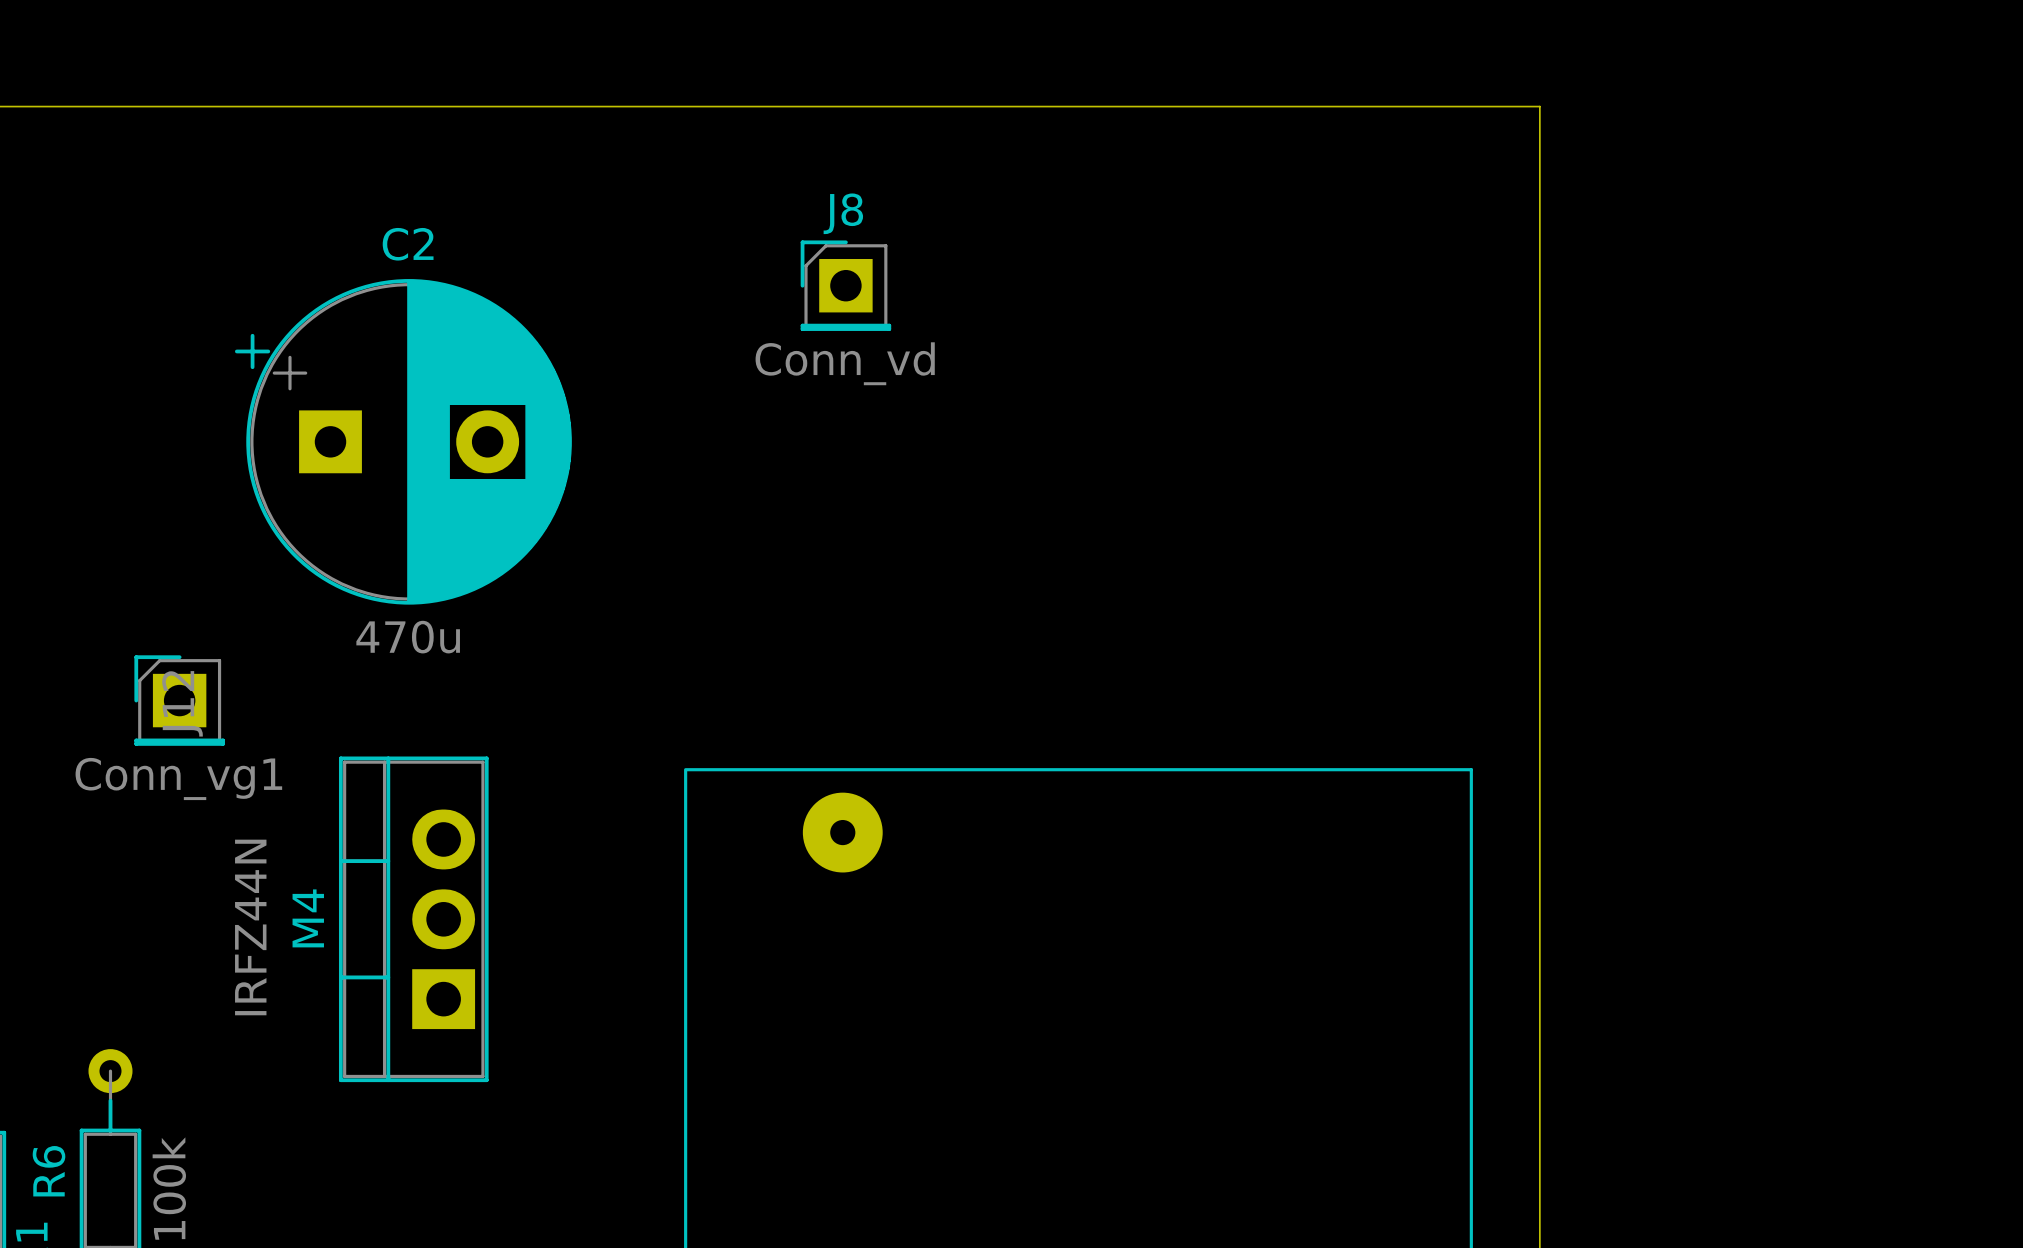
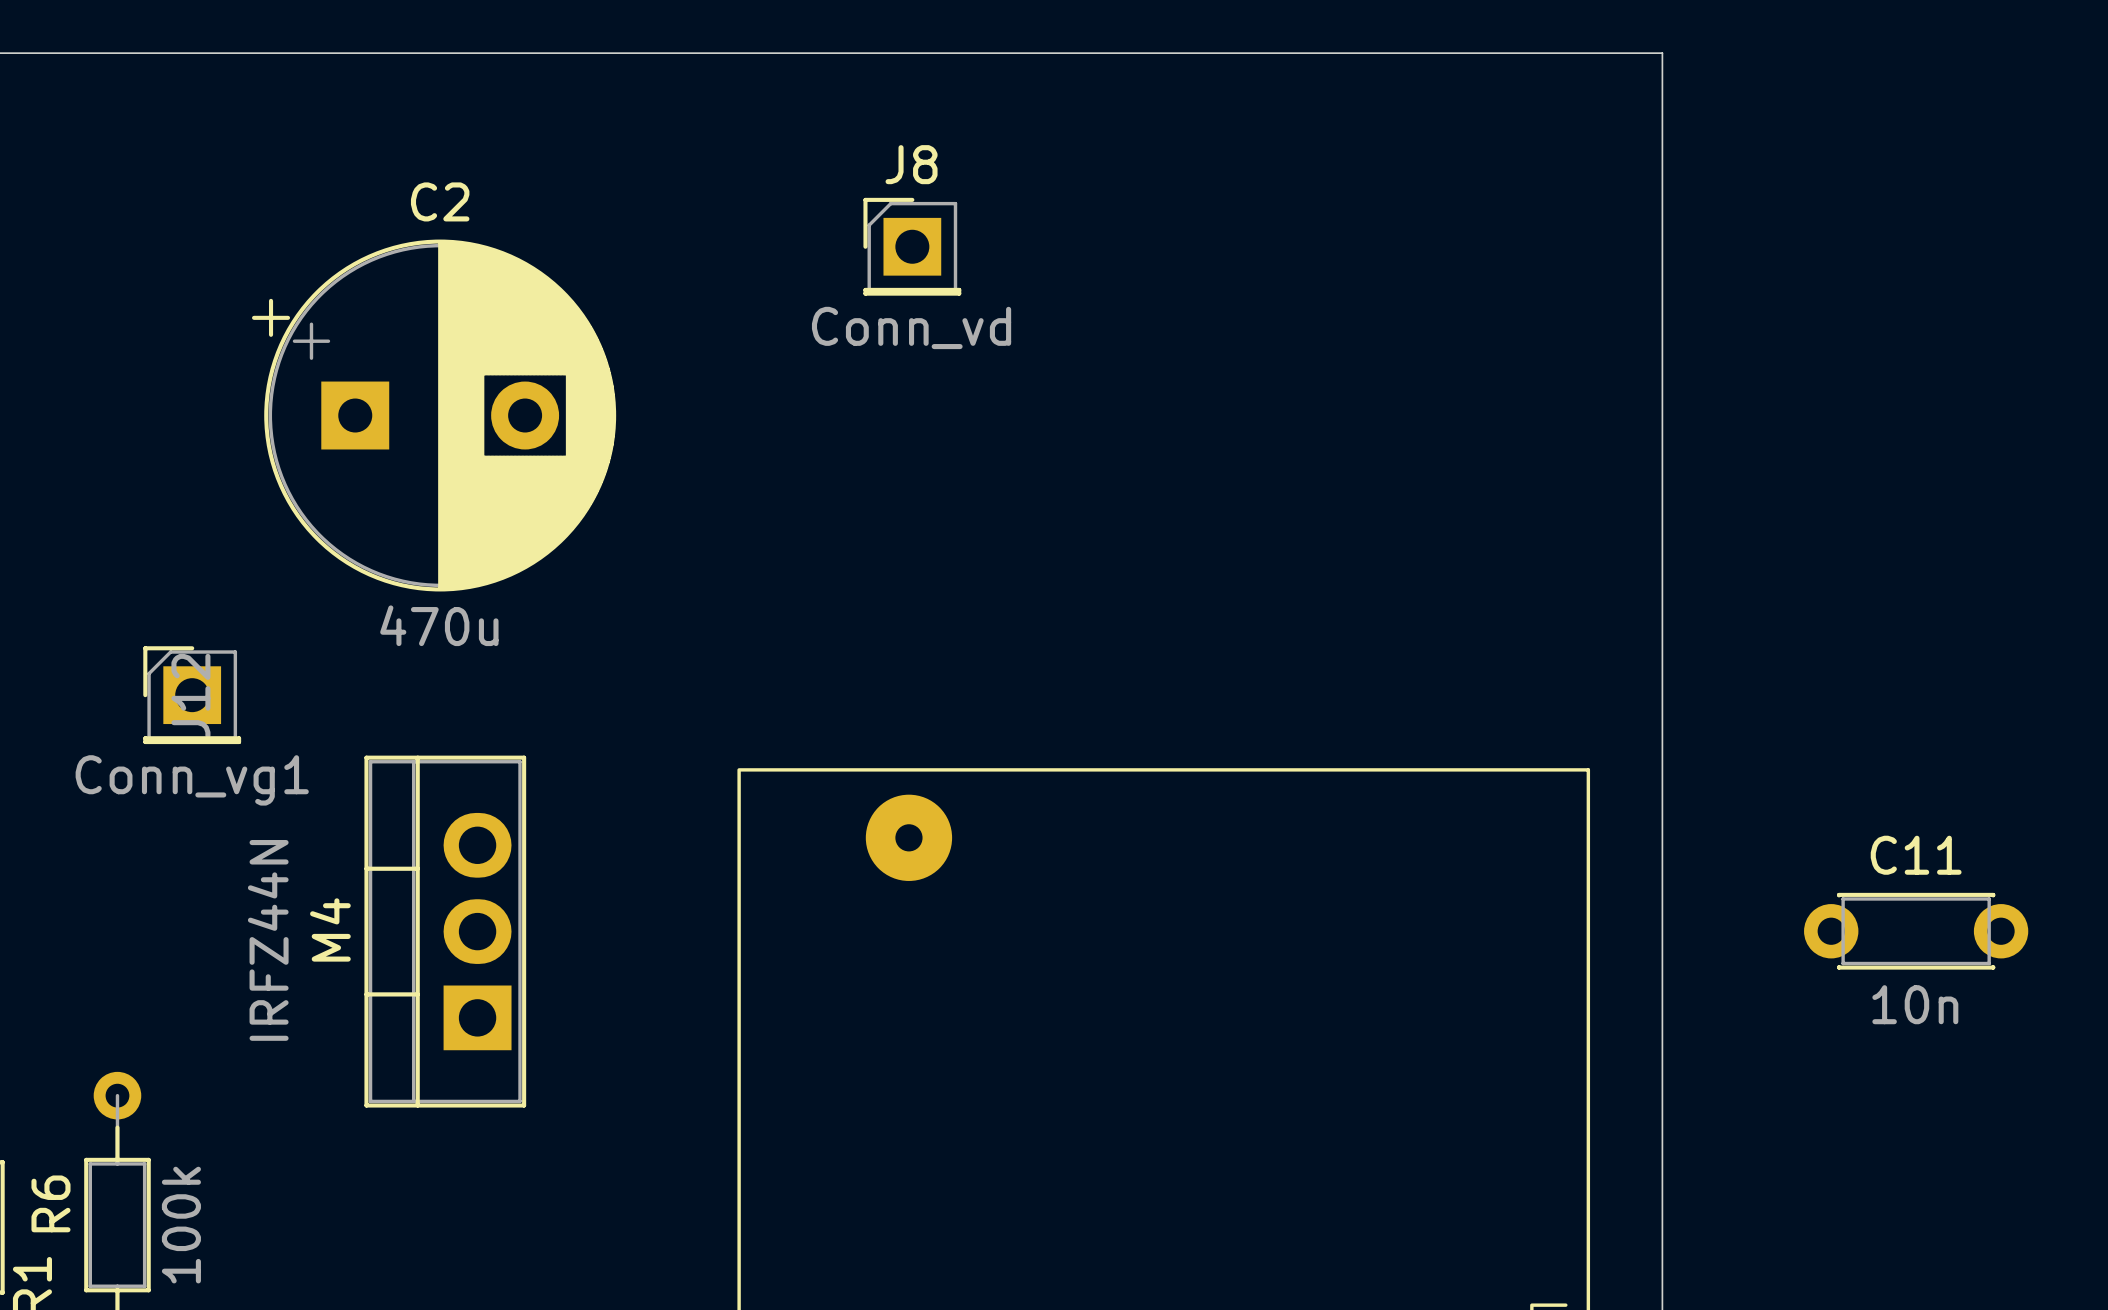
C11: none -> 10n (1916, 931)

